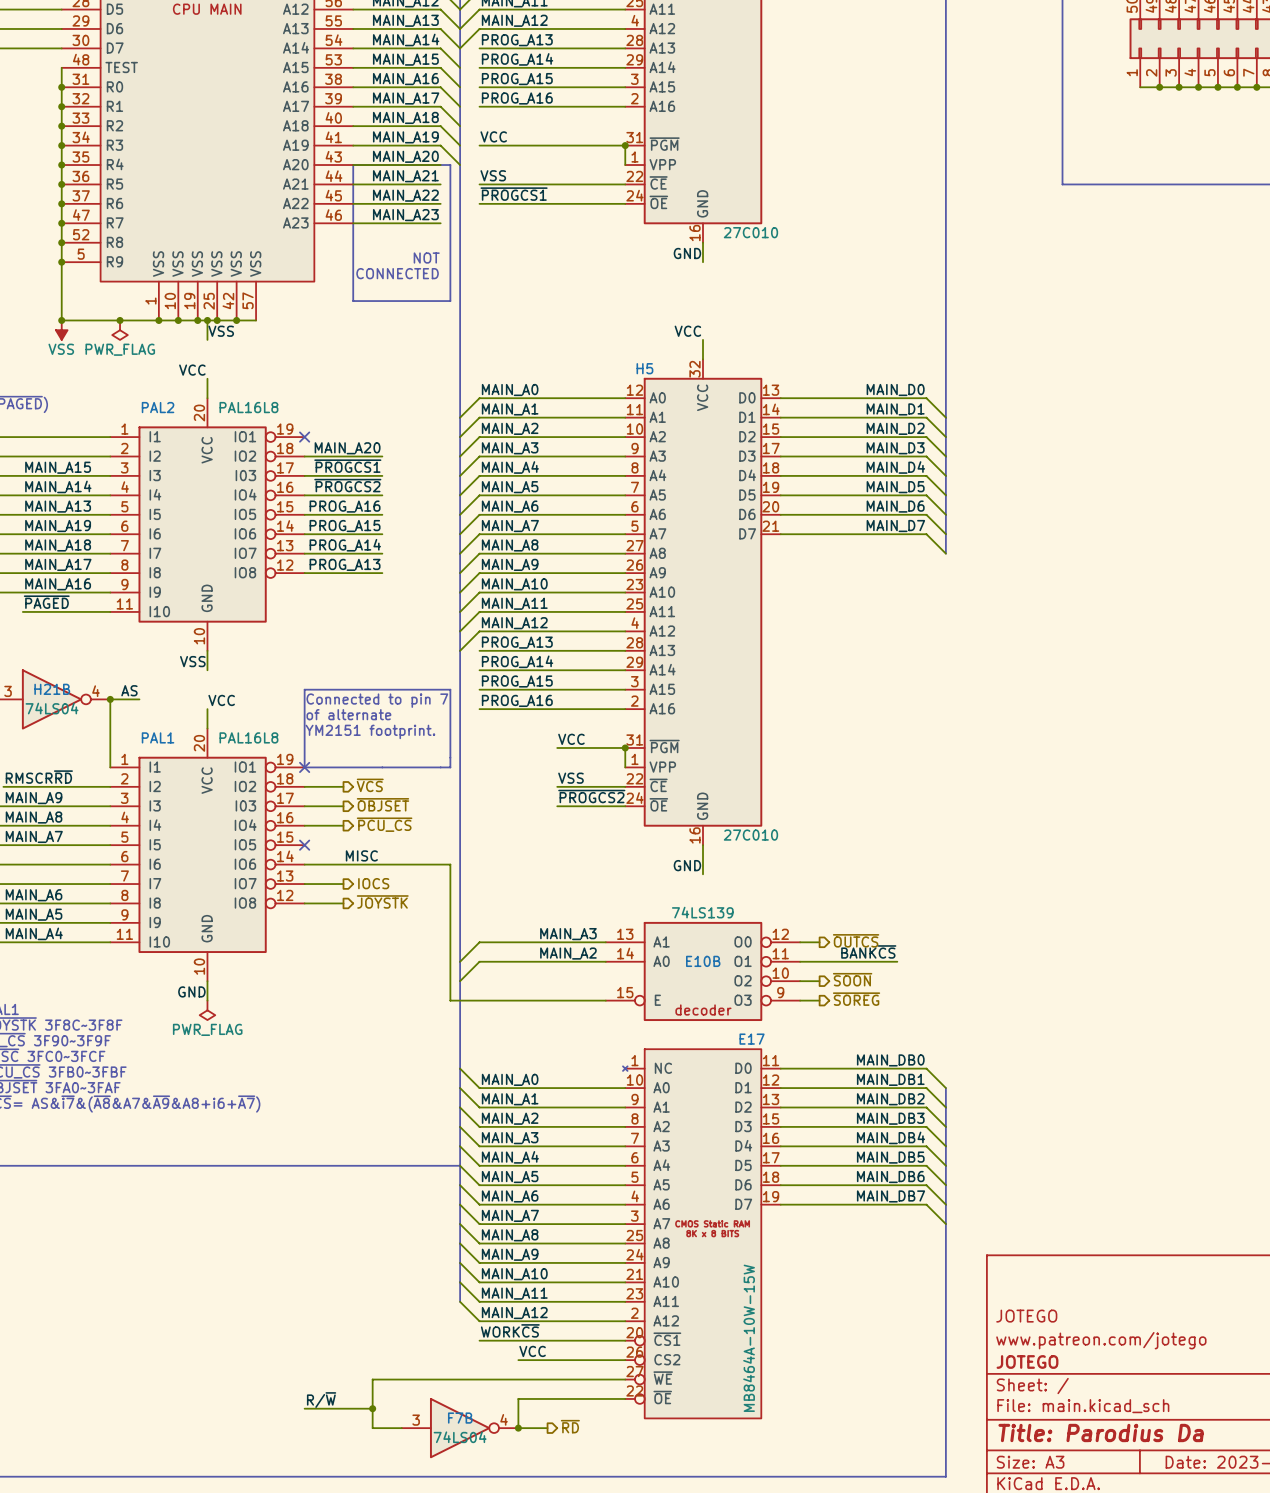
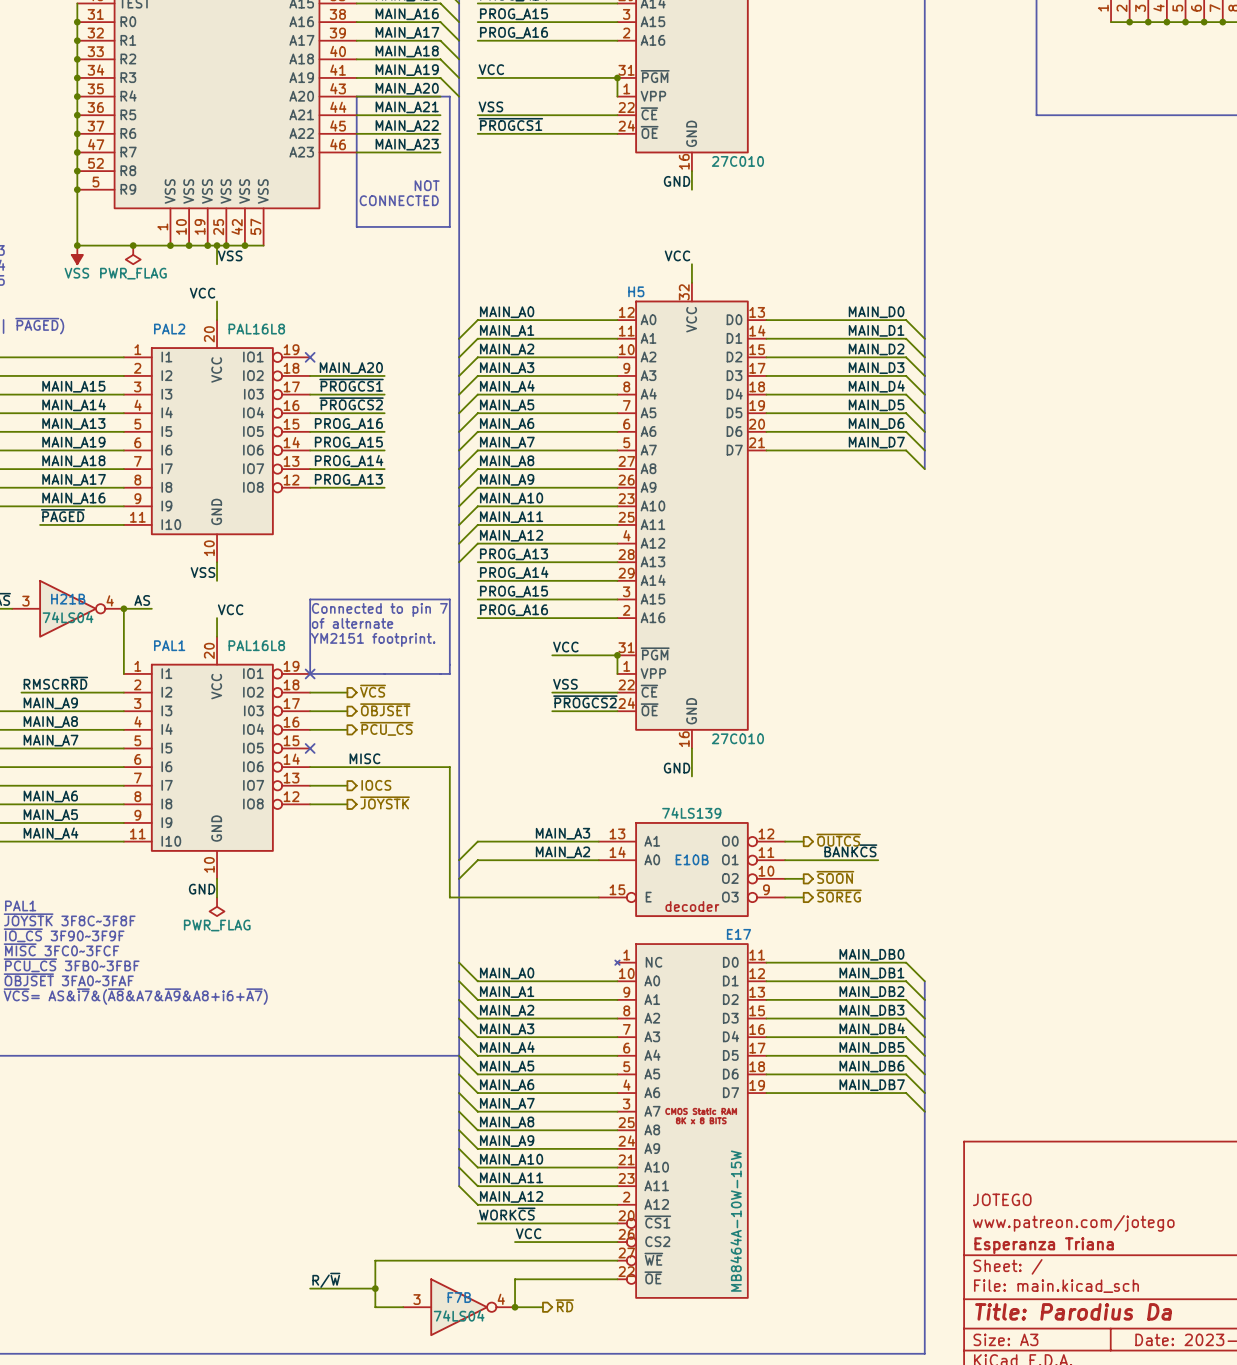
title block: JOTEGO (1027, 1361) -> Esperanza Triana (1044, 1245)

